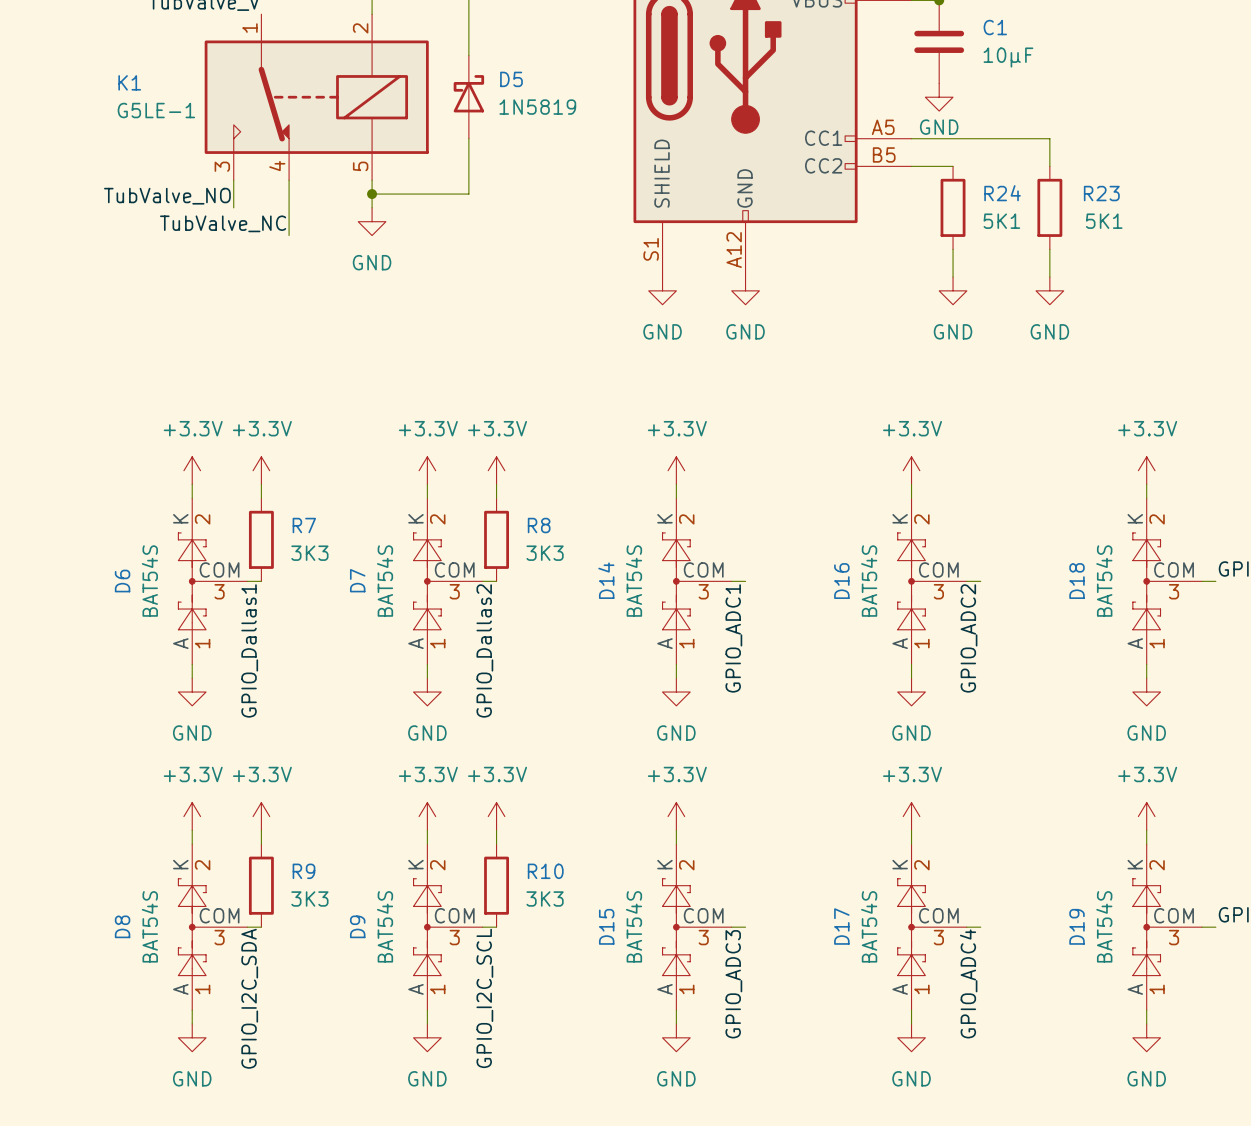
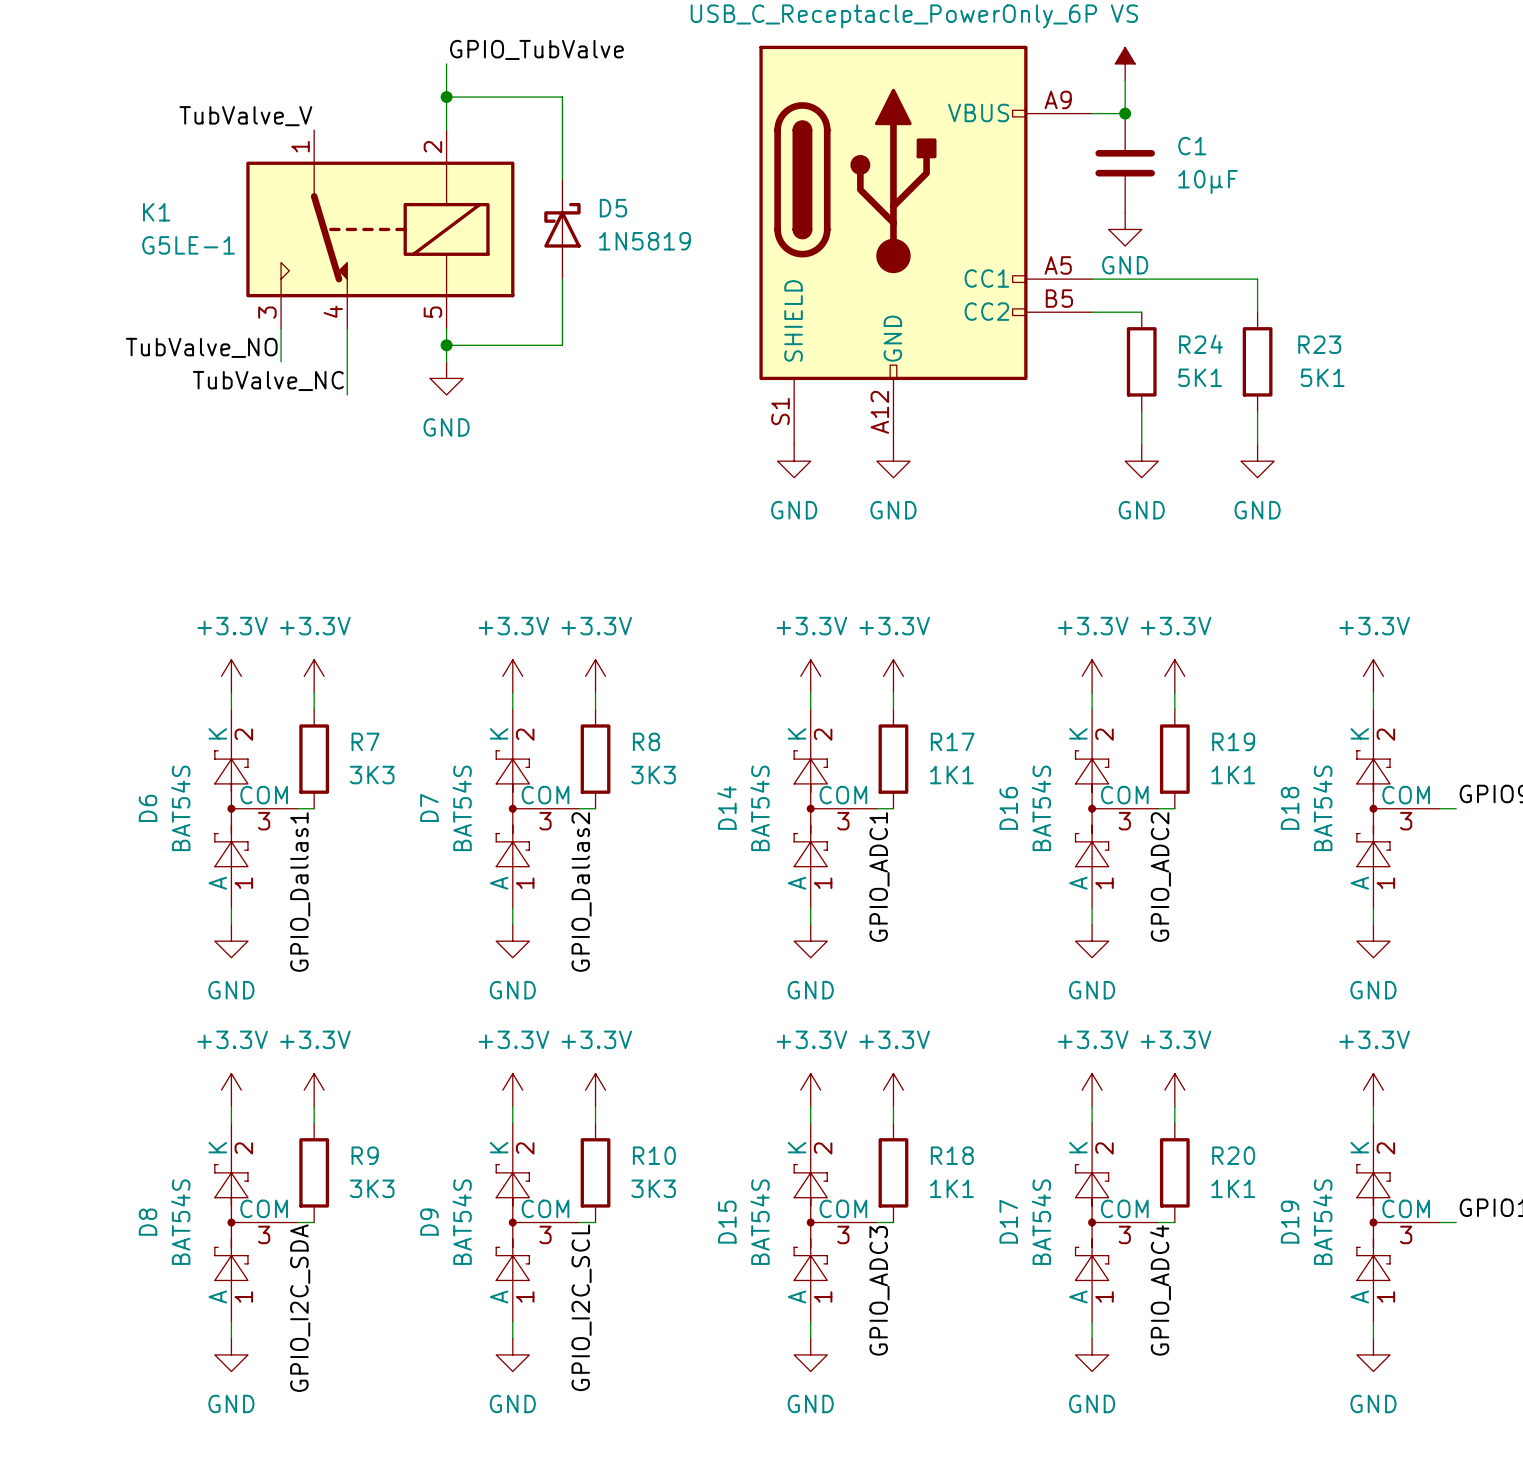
power symbol: none -> +3.3V (893, 676)
power symbol: none -> +3.3V (1174, 676)
wire: none -> (893, 692) (893, 709)
wire: none -> (1174, 692) (1174, 709)
R17: none -> 1K1 (893, 759)
R19: none -> 1K1 (1174, 759)
power symbol: none -> +3.3V (893, 1090)
power symbol: none -> +3.3V (1174, 1090)
wire: none -> (893, 1106) (893, 1123)
wire: none -> (1174, 1106) (1174, 1123)
R18: none -> 1K1 (893, 1172)
R20: none -> 1K1 (1174, 1172)

